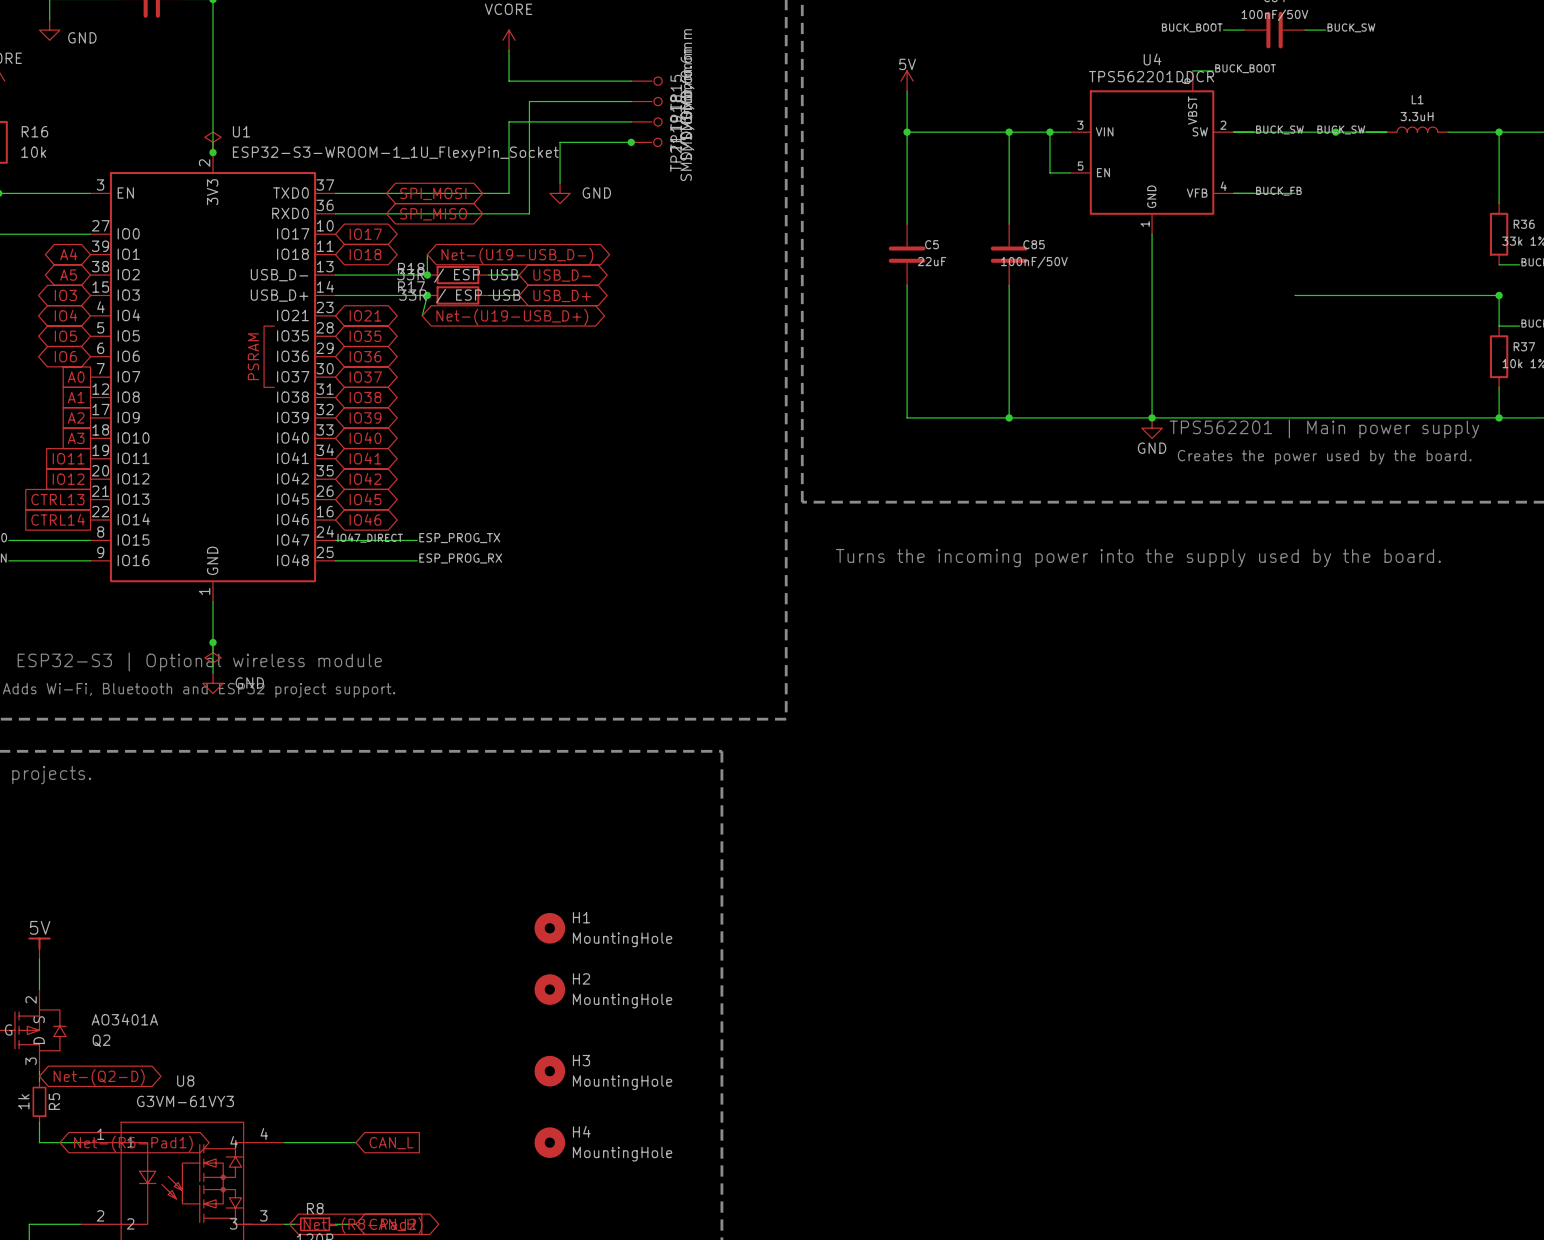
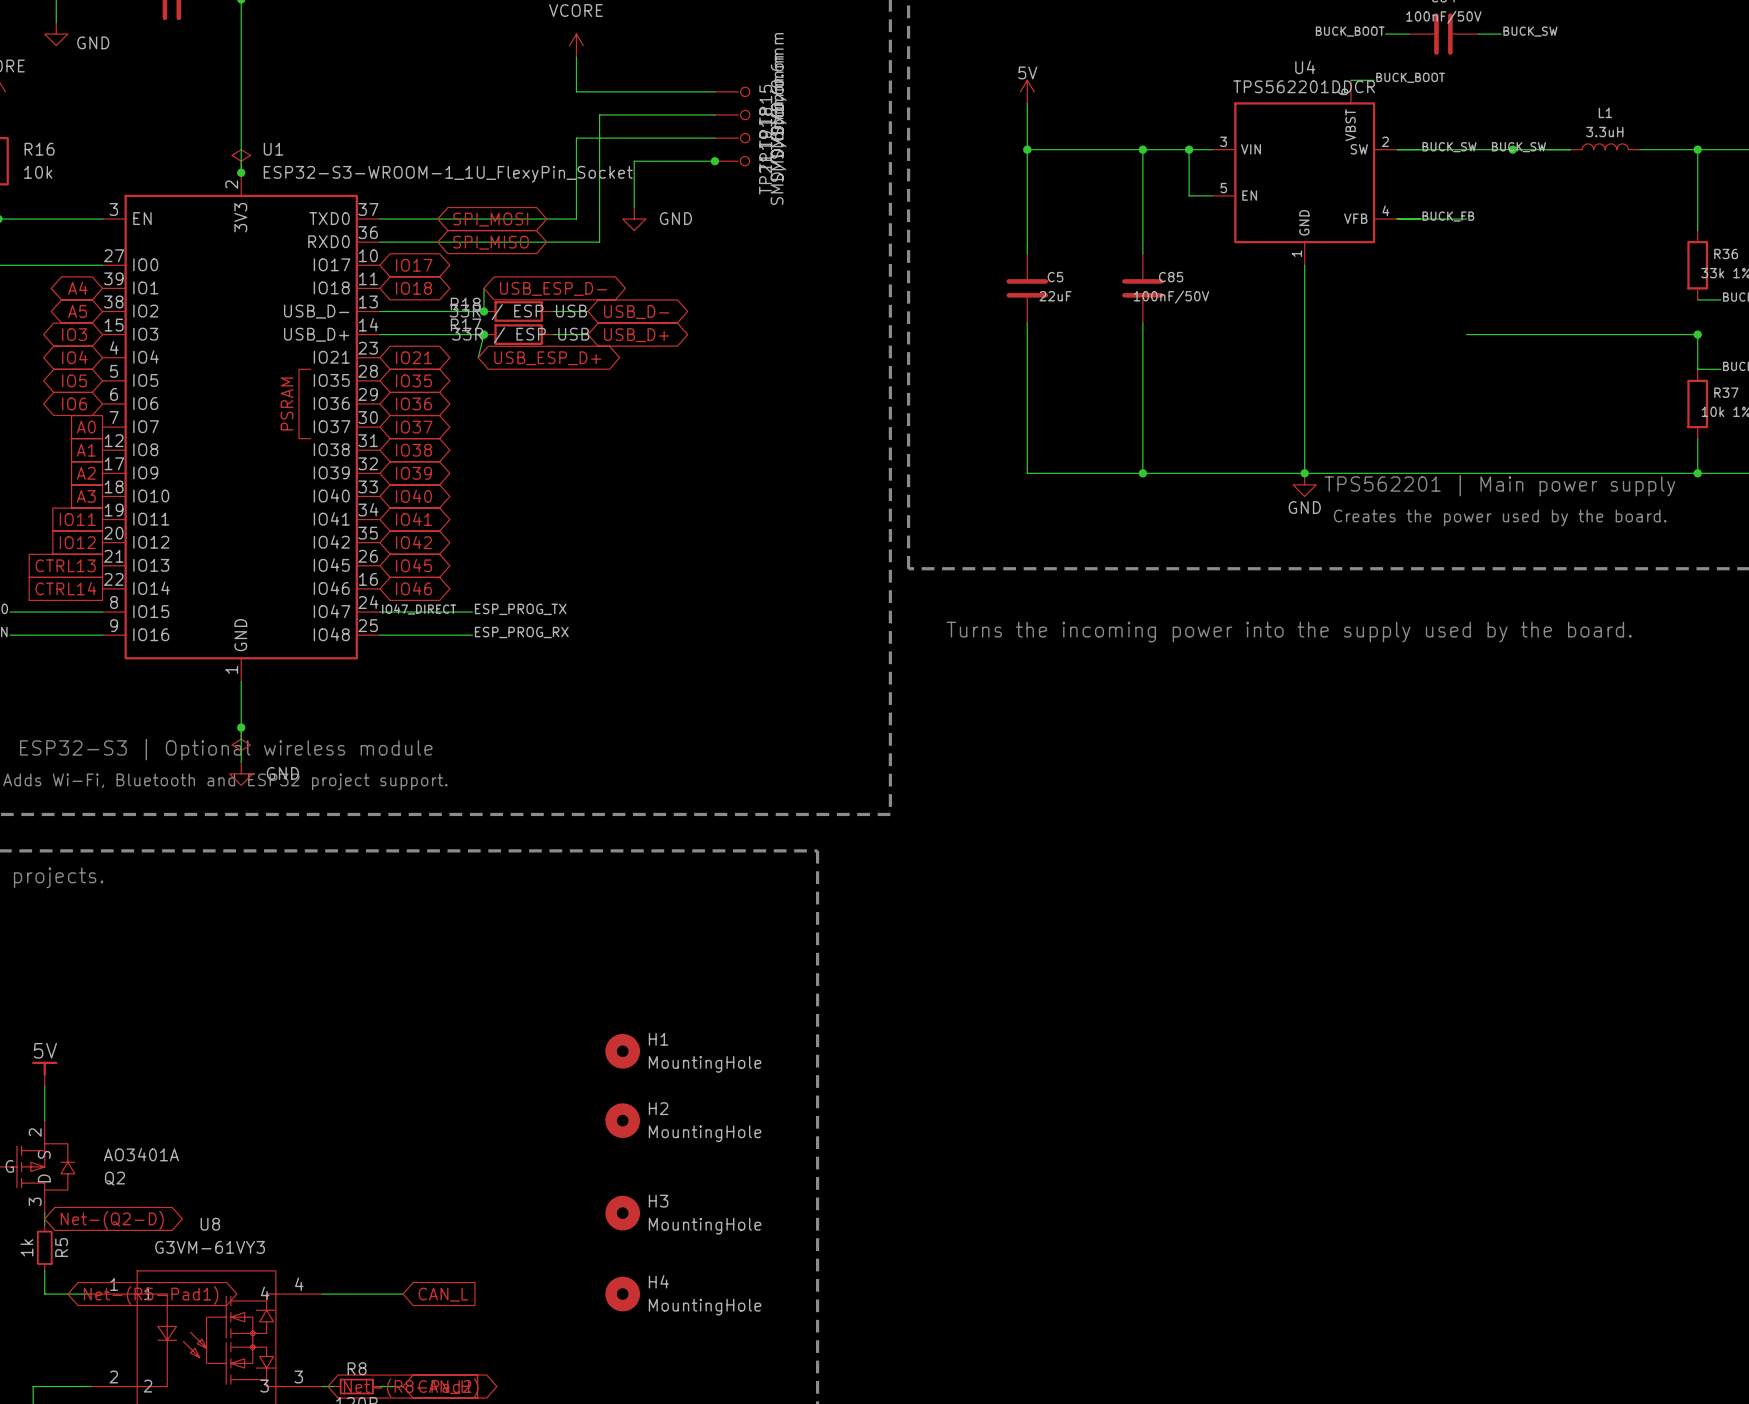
global label: Net-(U19-USB_D-) (517, 255) -> USB_ESP_D- (553, 288)
global label: Net-(U19-USB_D+) (512, 317) -> USB_ESP_D+ (547, 358)

